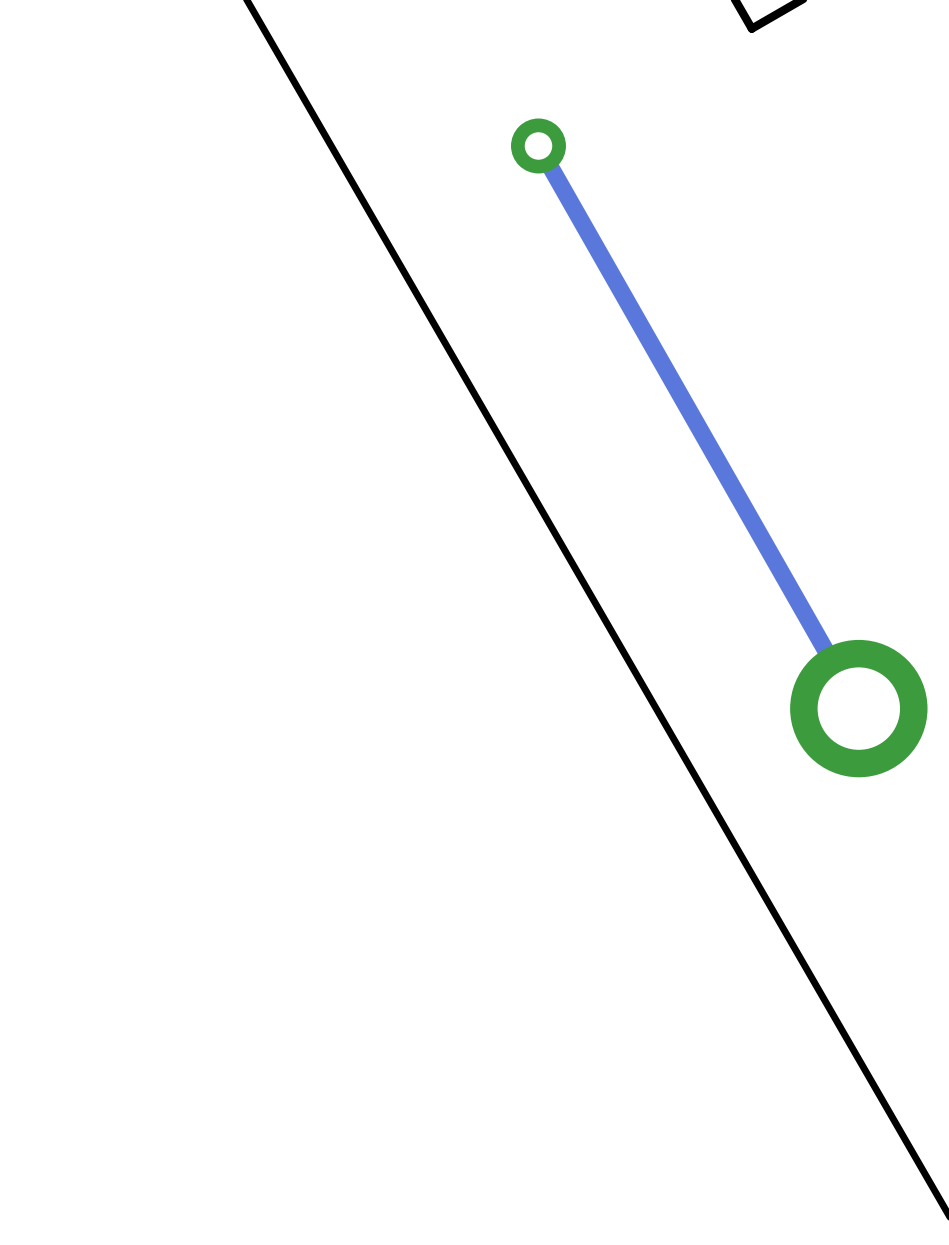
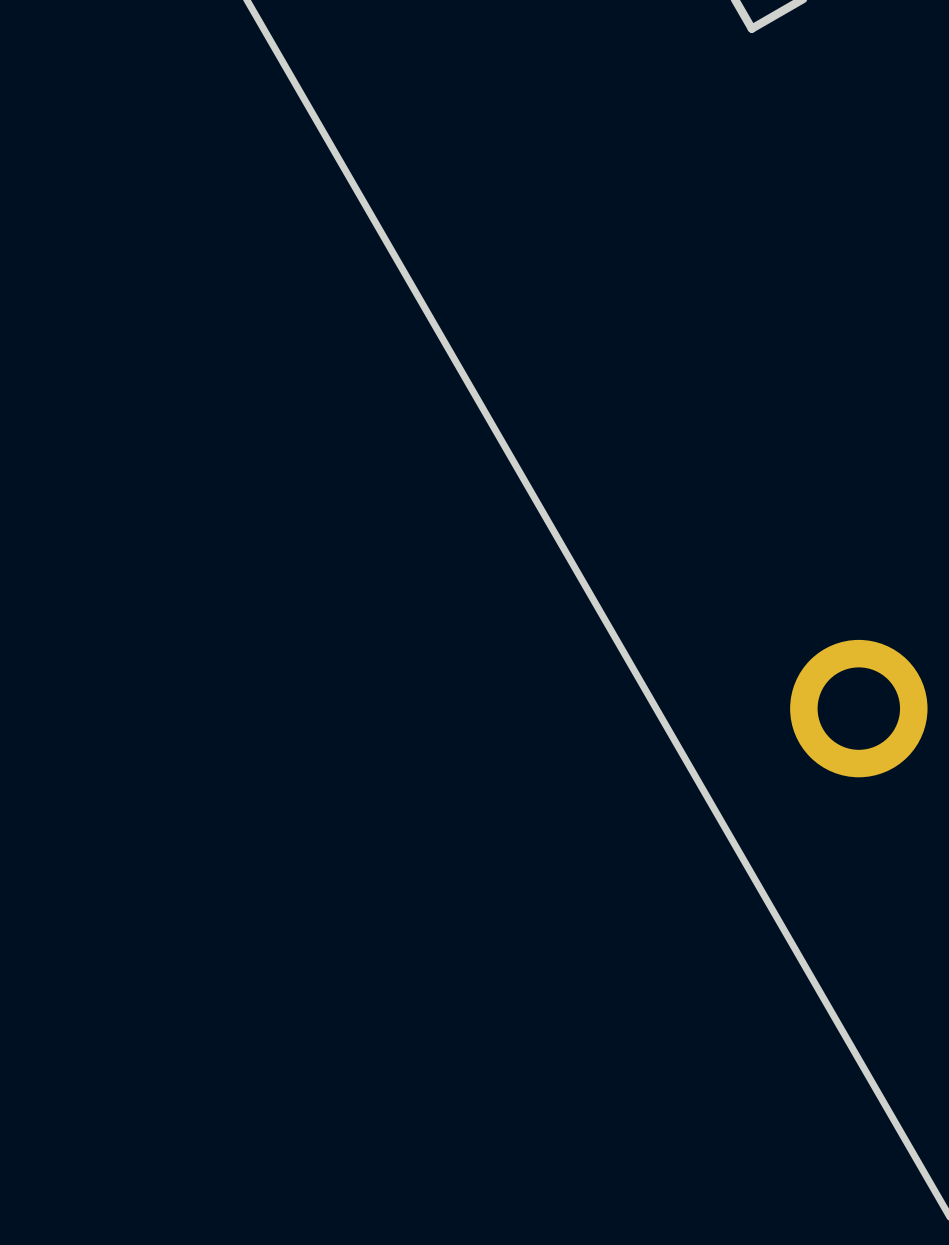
track: (538, 145) (858, 708) -> none
via: (538, 145) -> none

